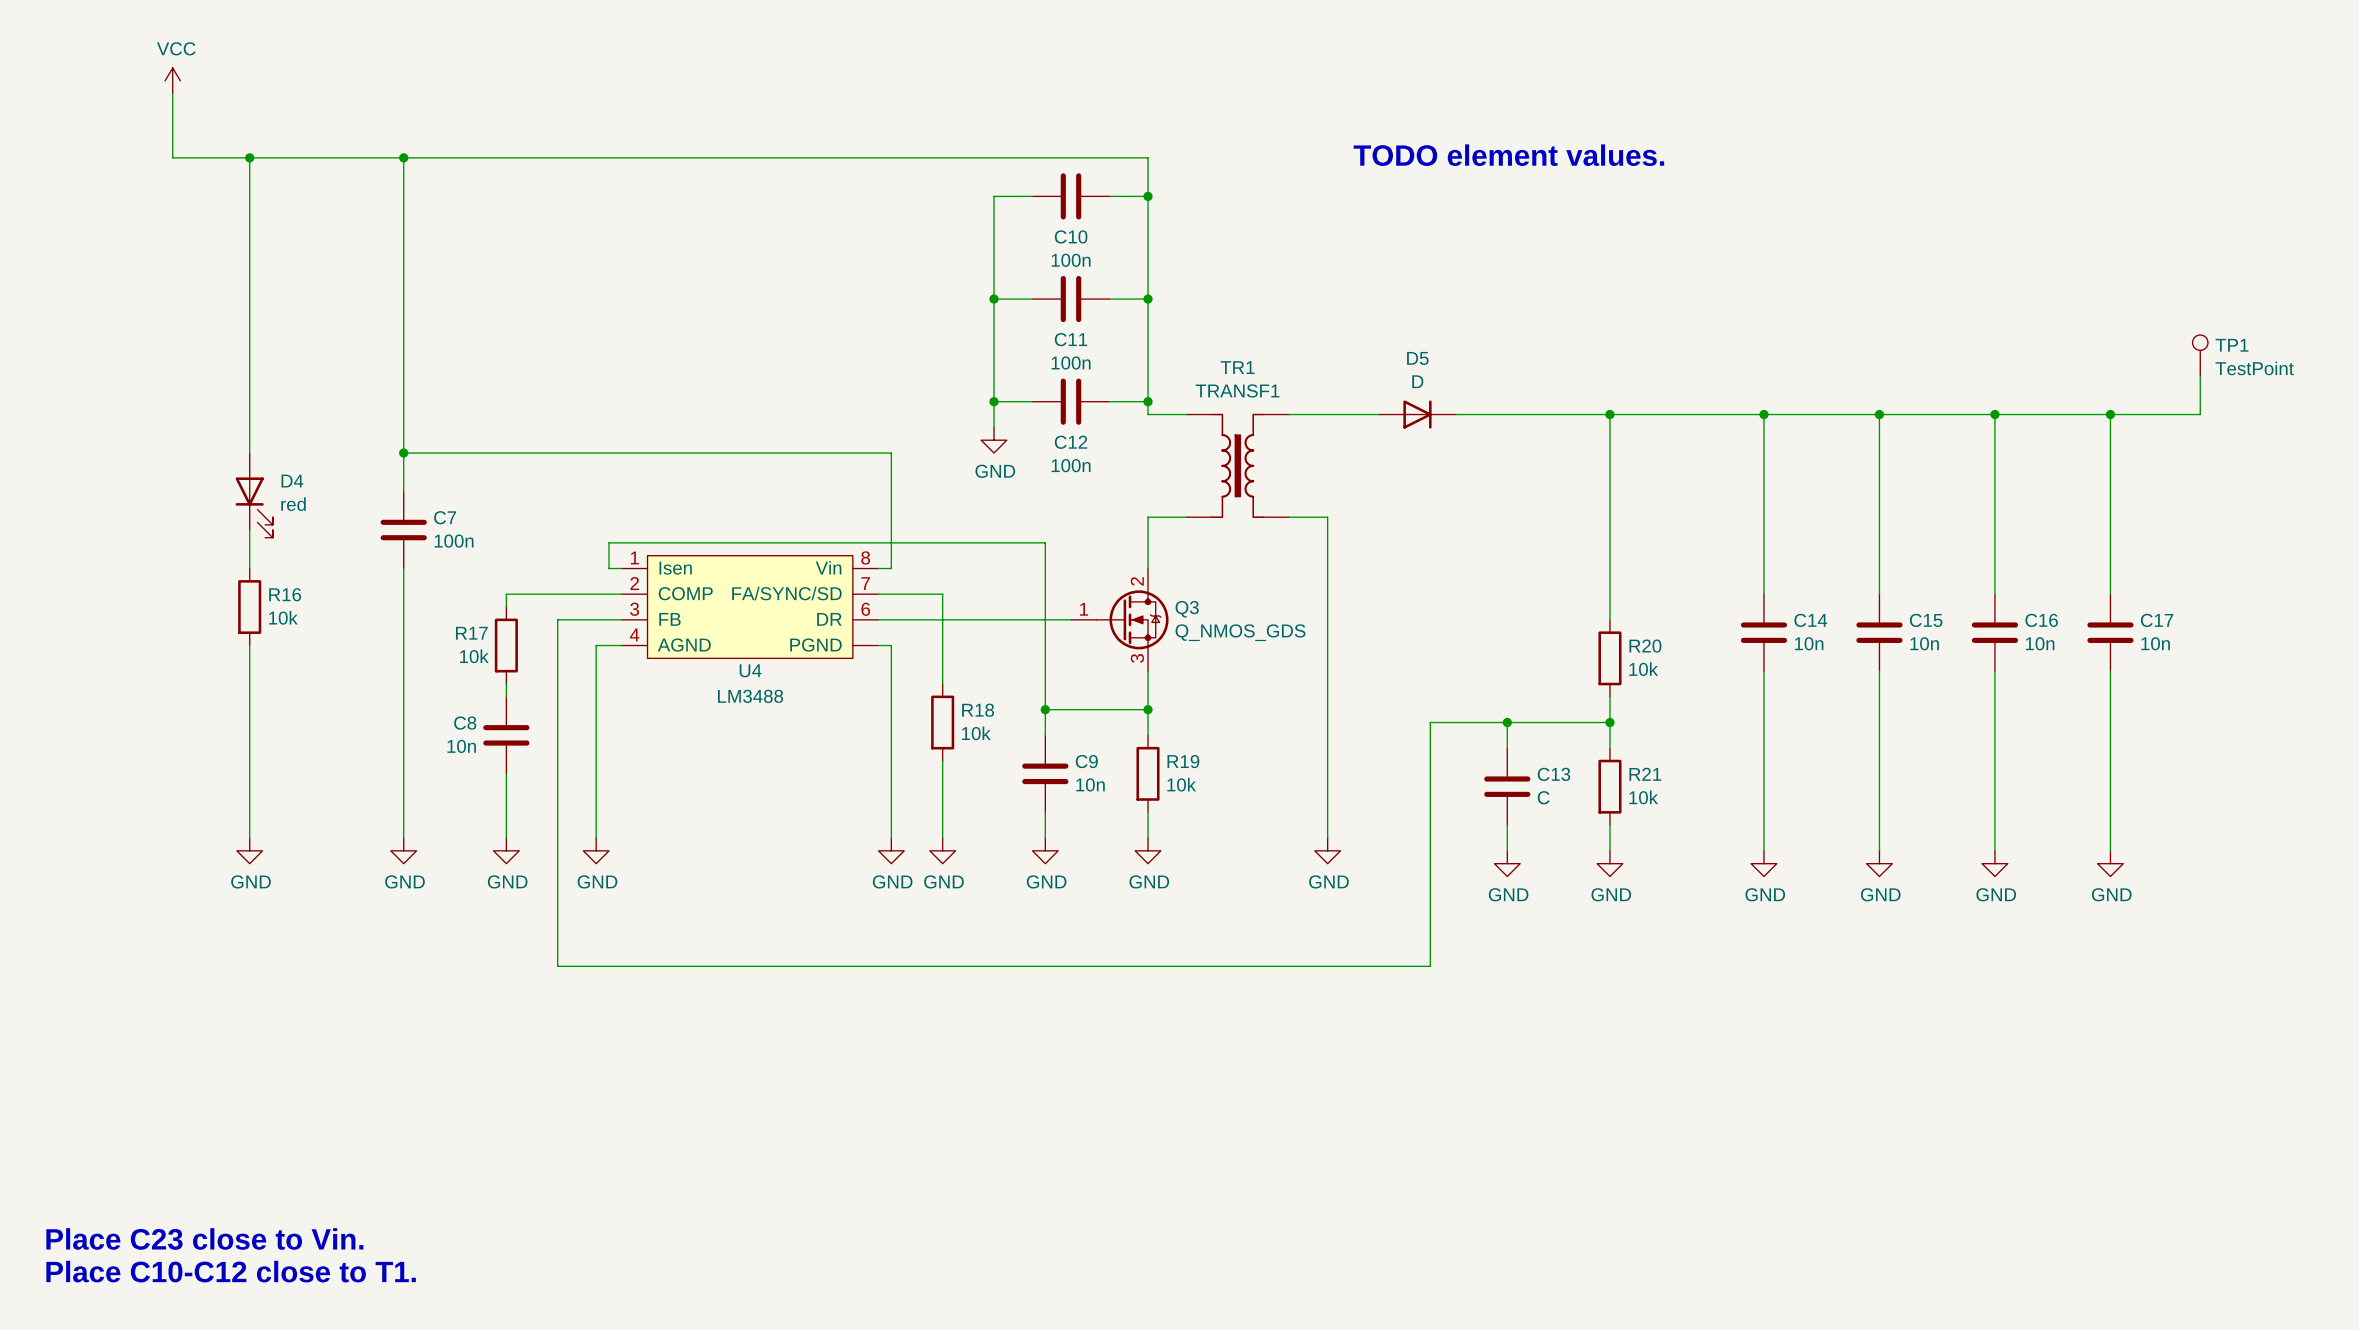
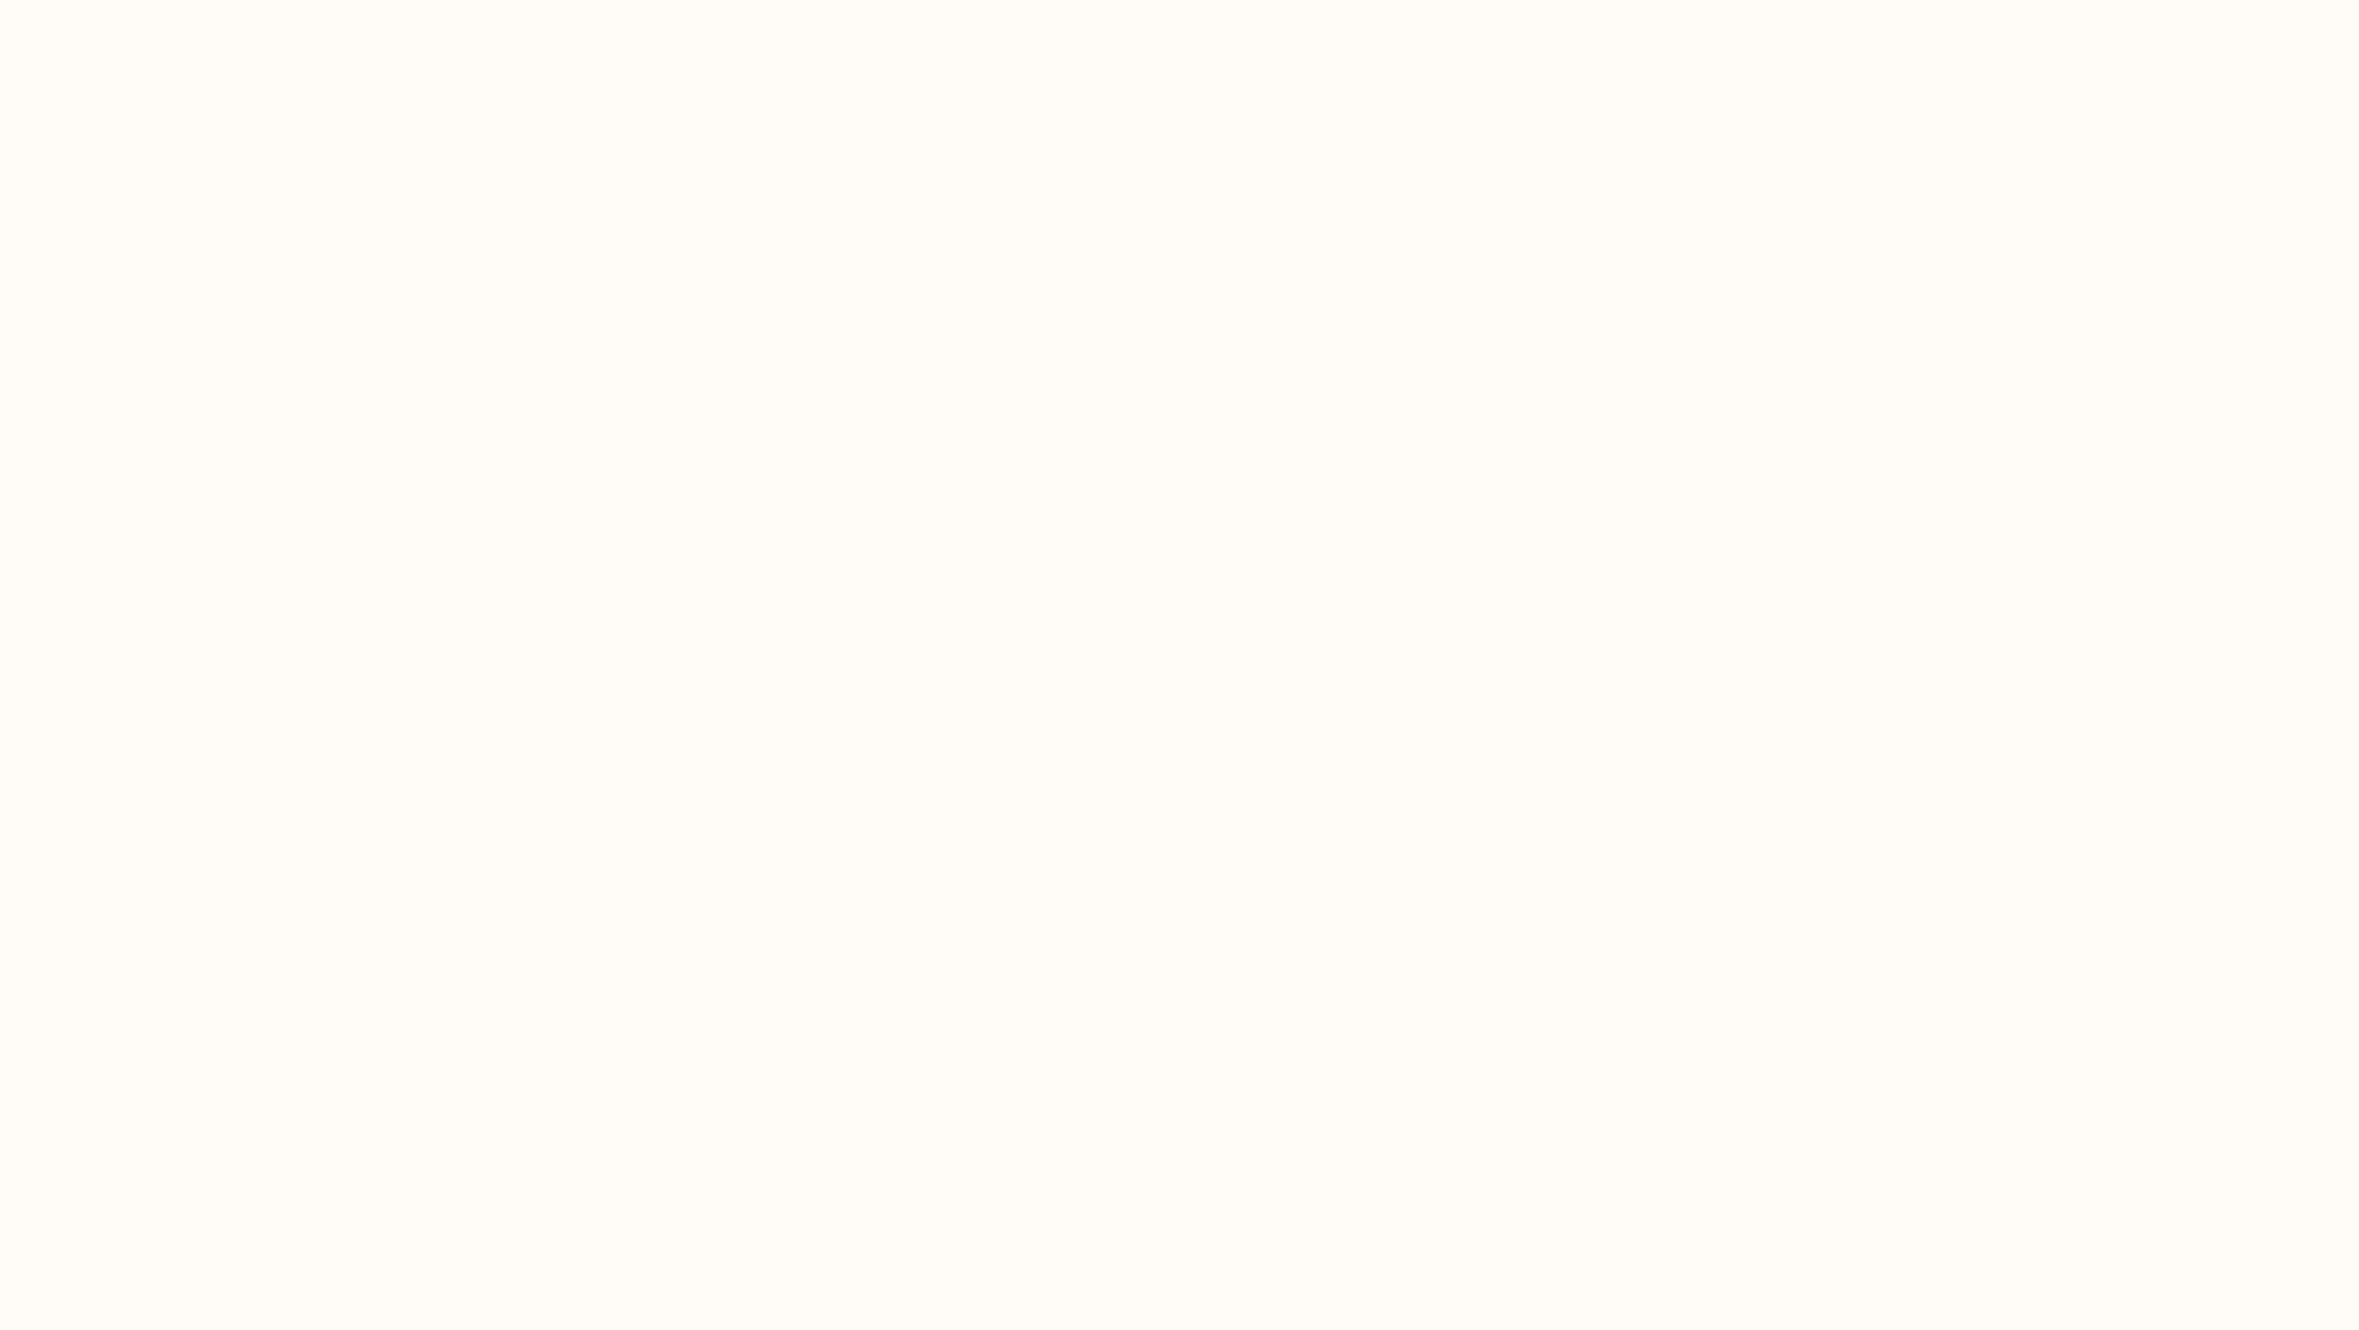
power symbol: VCC (172, 80) -> none
wire: (172, 93) (172, 157) (1147, 157) (1147, 414) (1186, 414) -> none
text: TODO element values. (1508, 155) -> none
wire: (249, 157) (249, 453) -> none
junction: (249, 157) -> none
wire: (403, 157) (403, 491) -> none
junction: (403, 157) -> none
wire: (1032, 196) (994, 196) (994, 427) -> none
C10: 100n (1071, 196) -> none
wire: (1109, 196) (1147, 196) -> none
junction: (1147, 196) -> none
wire: (994, 299) (1032, 299) -> none
junction: (994, 299) -> none
C11: 100n (1071, 299) -> none
wire: (1109, 299) (1147, 299) -> none
junction: (1147, 299) -> none
TP1: TestPoint (2200, 355) -> none
wire: (2200, 376) (2200, 414) (1455, 414) -> none
wire: (994, 401) (1032, 401) -> none
junction: (994, 401) -> none
C12: 100n (1071, 401) -> none
wire: (1109, 401) (1147, 401) -> none
junction: (1147, 401) -> none
wire: (1289, 414) (1378, 414) -> none
D5: D (1417, 414) -> none
wire: (1609, 414) (1609, 619) -> none
junction: (1609, 414) -> none
wire: (1763, 414) (1763, 594) -> none
junction: (1763, 414) -> none
wire: (1879, 414) (1879, 594) -> none
junction: (1879, 414) -> none
wire: (1994, 414) (1994, 594) -> none
junction: (1994, 414) -> none
wire: (2110, 414) (2110, 594) -> none
junction: (2110, 414) -> none
power symbol: GND (994, 440) -> none
wire: (403, 453) (891, 453) (891, 568) (878, 568) -> none
junction: (403, 453) -> none
TR1: TRANSF1 (1237, 465) -> none
D4: red (254, 495) -> none
wire: (1186, 517) (1147, 517) (1147, 568) -> none
wire: (1289, 517) (1327, 517) (1327, 838) -> none
wire: (249, 530) (249, 568) -> none
C7: 100n (403, 530) -> none
wire: (403, 568) (403, 838) -> none
wire: (621, 568) (609, 568) (609, 542) (1045, 542) (1045, 735) -> none
wire: (621, 594) (506, 594) (506, 607) -> none
wire: (878, 594) (942, 594) (942, 684) -> none
R16: 10k (249, 607) -> none
U4: LM3488 (750, 607) -> none
wire: (621, 619) (557, 619) (557, 966) (1430, 966) (1430, 722) (1609, 722) -> none
wire: (878, 619) (1071, 619) -> none
Q3: Q_NMOS_GDS (1119, 619) -> none
C14: 10n (1763, 632) -> none
C15: 10n (1879, 632) -> none
C16: 10n (1994, 632) -> none
C17: 10n (2110, 632) -> none
wire: (249, 645) (249, 838) -> none
R17: 10k (506, 645) -> none
wire: (621, 645) (596, 645) (596, 838) -> none
wire: (878, 645) (891, 645) (891, 838) -> none
R20: 10k (1609, 658) -> none
wire: (1147, 671) (1147, 735) -> none
wire: (1763, 671) (1763, 850) -> none
wire: (1879, 671) (1879, 850) -> none
wire: (1994, 671) (1994, 850) -> none
wire: (2110, 671) (2110, 850) -> none
wire: (506, 684) (506, 696) -> none
wire: (1609, 696) (1609, 748) -> none
wire: (1045, 709) (1147, 709) -> none
junction: (1045, 709) -> none
junction: (1147, 709) -> none
R18: 10k (942, 722) -> none
wire: (1507, 722) (1507, 748) -> none
junction: (1507, 722) -> none
junction: (1609, 722) -> none
C8: 10n (506, 735) -> none
wire: (942, 761) (942, 838) -> none
wire: (506, 773) (506, 838) -> none
C9: 10n (1045, 773) -> none
R19: 10k (1147, 773) -> none
C13: C (1507, 786) -> none
R21: 10k (1609, 786) -> none
wire: (1045, 812) (1045, 838) -> none
wire: (1147, 812) (1147, 838) -> none
wire: (1507, 825) (1507, 850) -> none
wire: (1609, 825) (1609, 850) -> none
power symbol: GND (249, 850) -> none
power symbol: GND (403, 850) -> none
power symbol: GND (506, 850) -> none
power symbol: GND (596, 850) -> none
power symbol: GND (891, 850) -> none
power symbol: GND (942, 850) -> none
power symbol: GND (1045, 850) -> none
power symbol: GND (1147, 850) -> none
power symbol: GND (1327, 850) -> none
power symbol: GND (1507, 863) -> none
power symbol: GND (1609, 863) -> none
power symbol: GND (1763, 863) -> none
power symbol: GND (1879, 863) -> none
power symbol: GND (1994, 863) -> none
power symbol: GND (2110, 863) -> none
text: Place C23 close to Vin. (204, 1238) -> none
text: Place C10-C12 close to T1. (231, 1271) -> none

